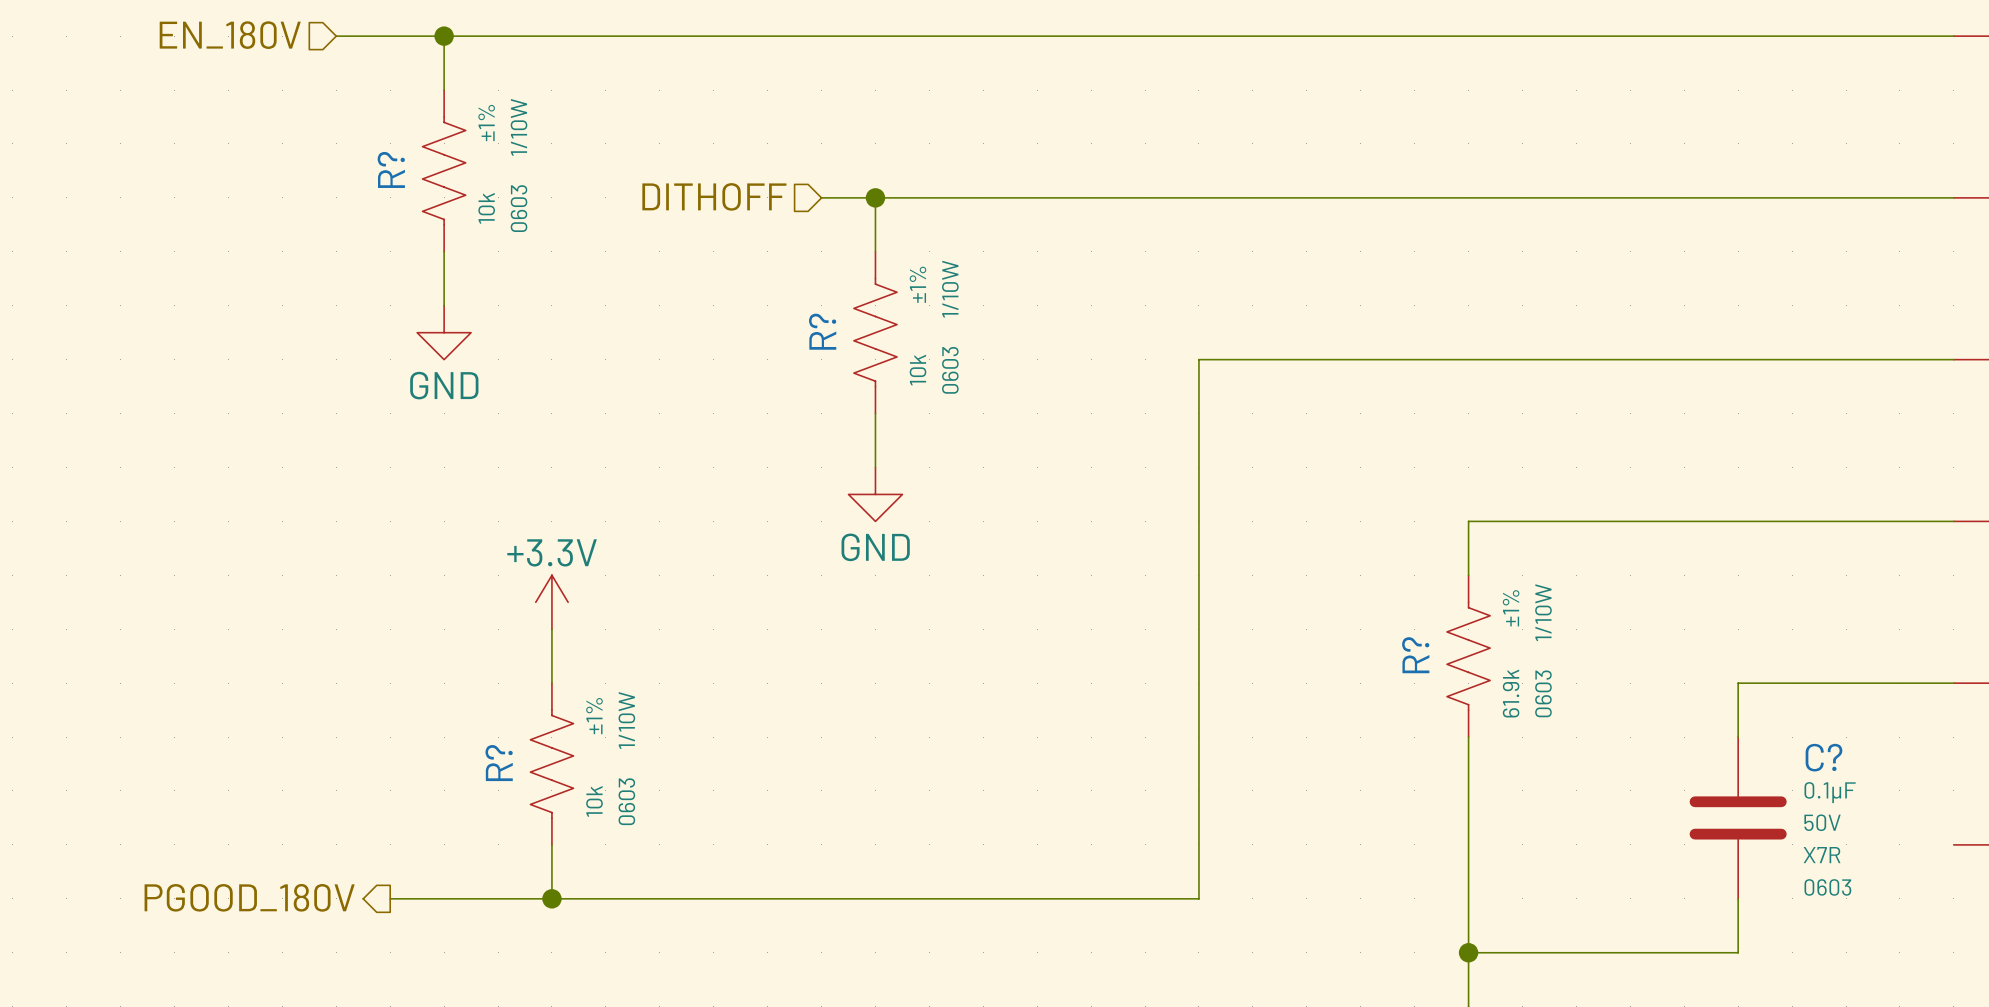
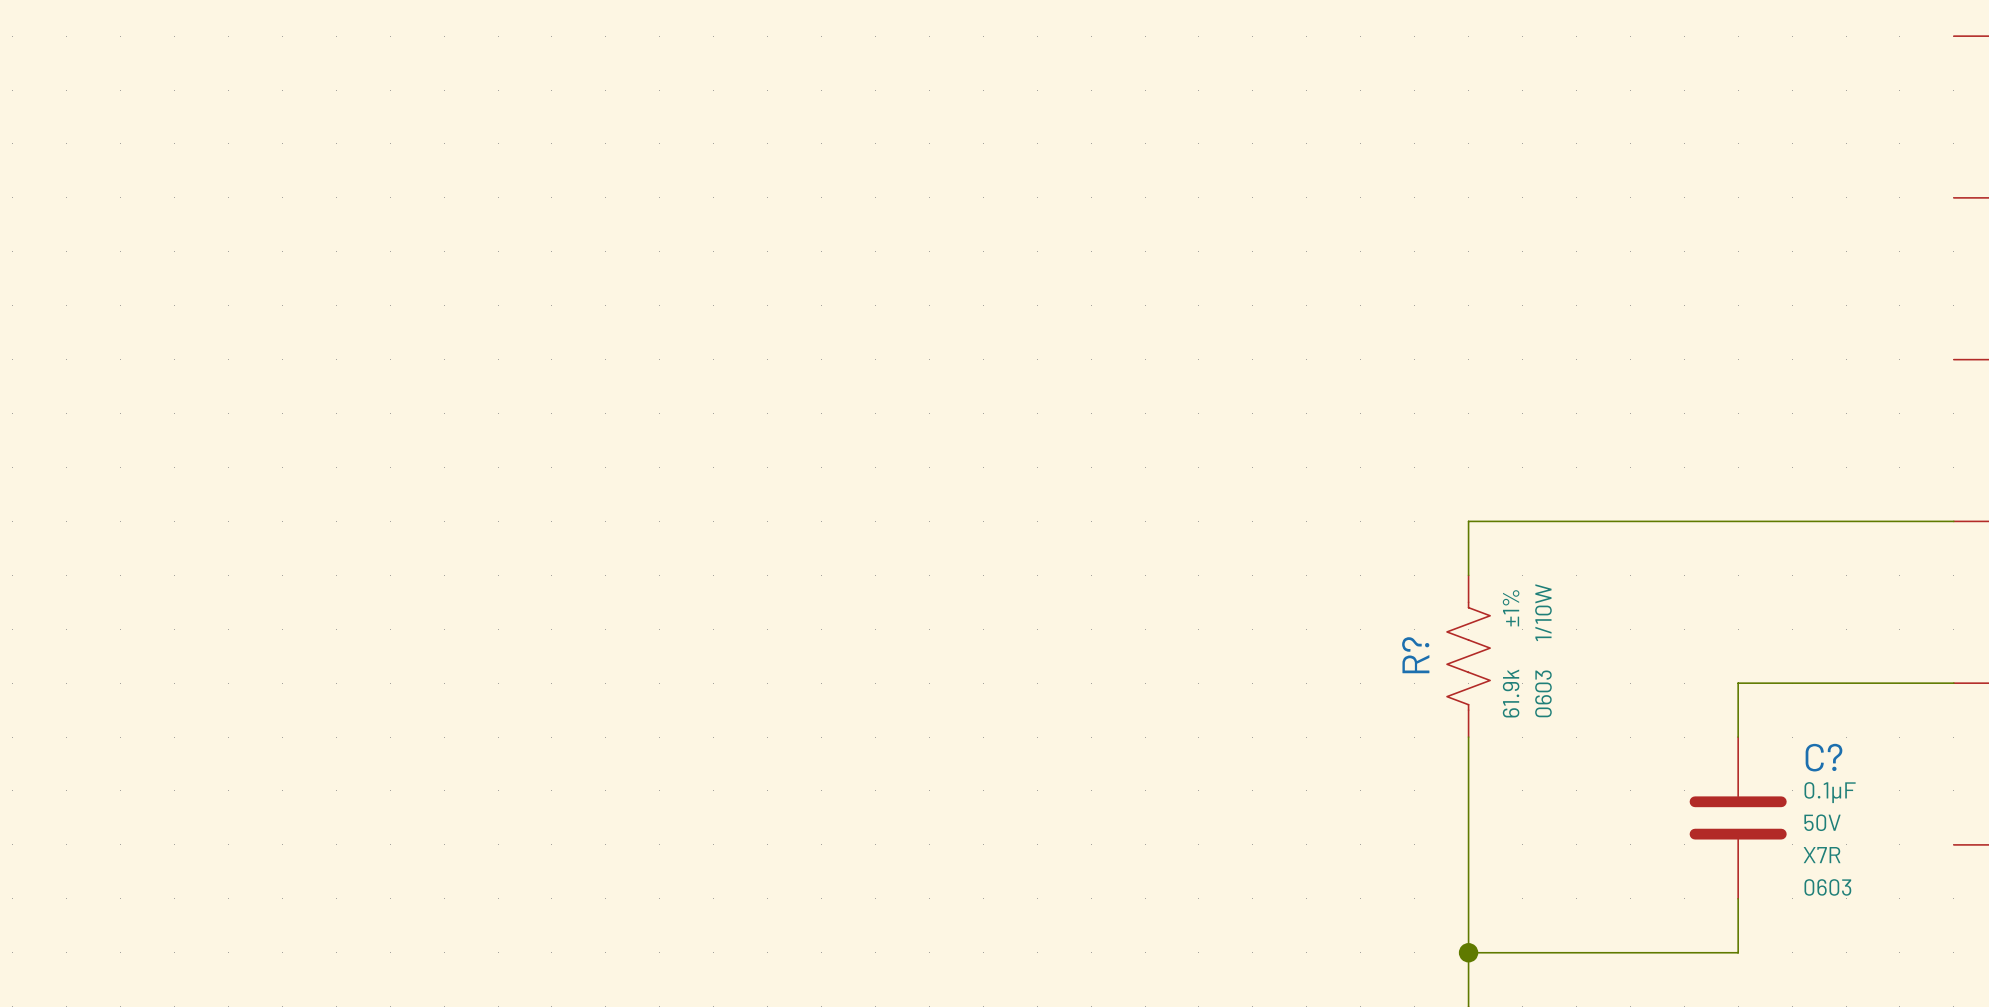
hierarchical label: EN_180V (230, 35) -> none
wire: (336, 36) (1953, 36) -> none
wire: (444, 36) (444, 90) -> none
junction: (444, 36) -> none
R?: (444, 170) -> none
hierarchical label: DITHOFF (714, 196) -> none
wire: (821, 197) (1953, 197) -> none
wire: (875, 197) (875, 251) -> none
junction: (875, 197) -> none
wire: (444, 251) (444, 305) -> none
power symbol: GND (444, 332) -> none
R?: (875, 332) -> none
wire: (1953, 359) (1198, 359) (1198, 898) (390, 898) -> none
wire: (875, 413) (875, 467) -> none
power symbol: GND (875, 494) -> none
power symbol: +3.3V (551, 602) -> none
wire: (551, 629) (551, 683) -> none
R?: (551, 764) -> none
wire: (551, 844) (551, 898) -> none
hierarchical label: PGOOD_180V (249, 897) -> none
junction: (551, 898) -> none

